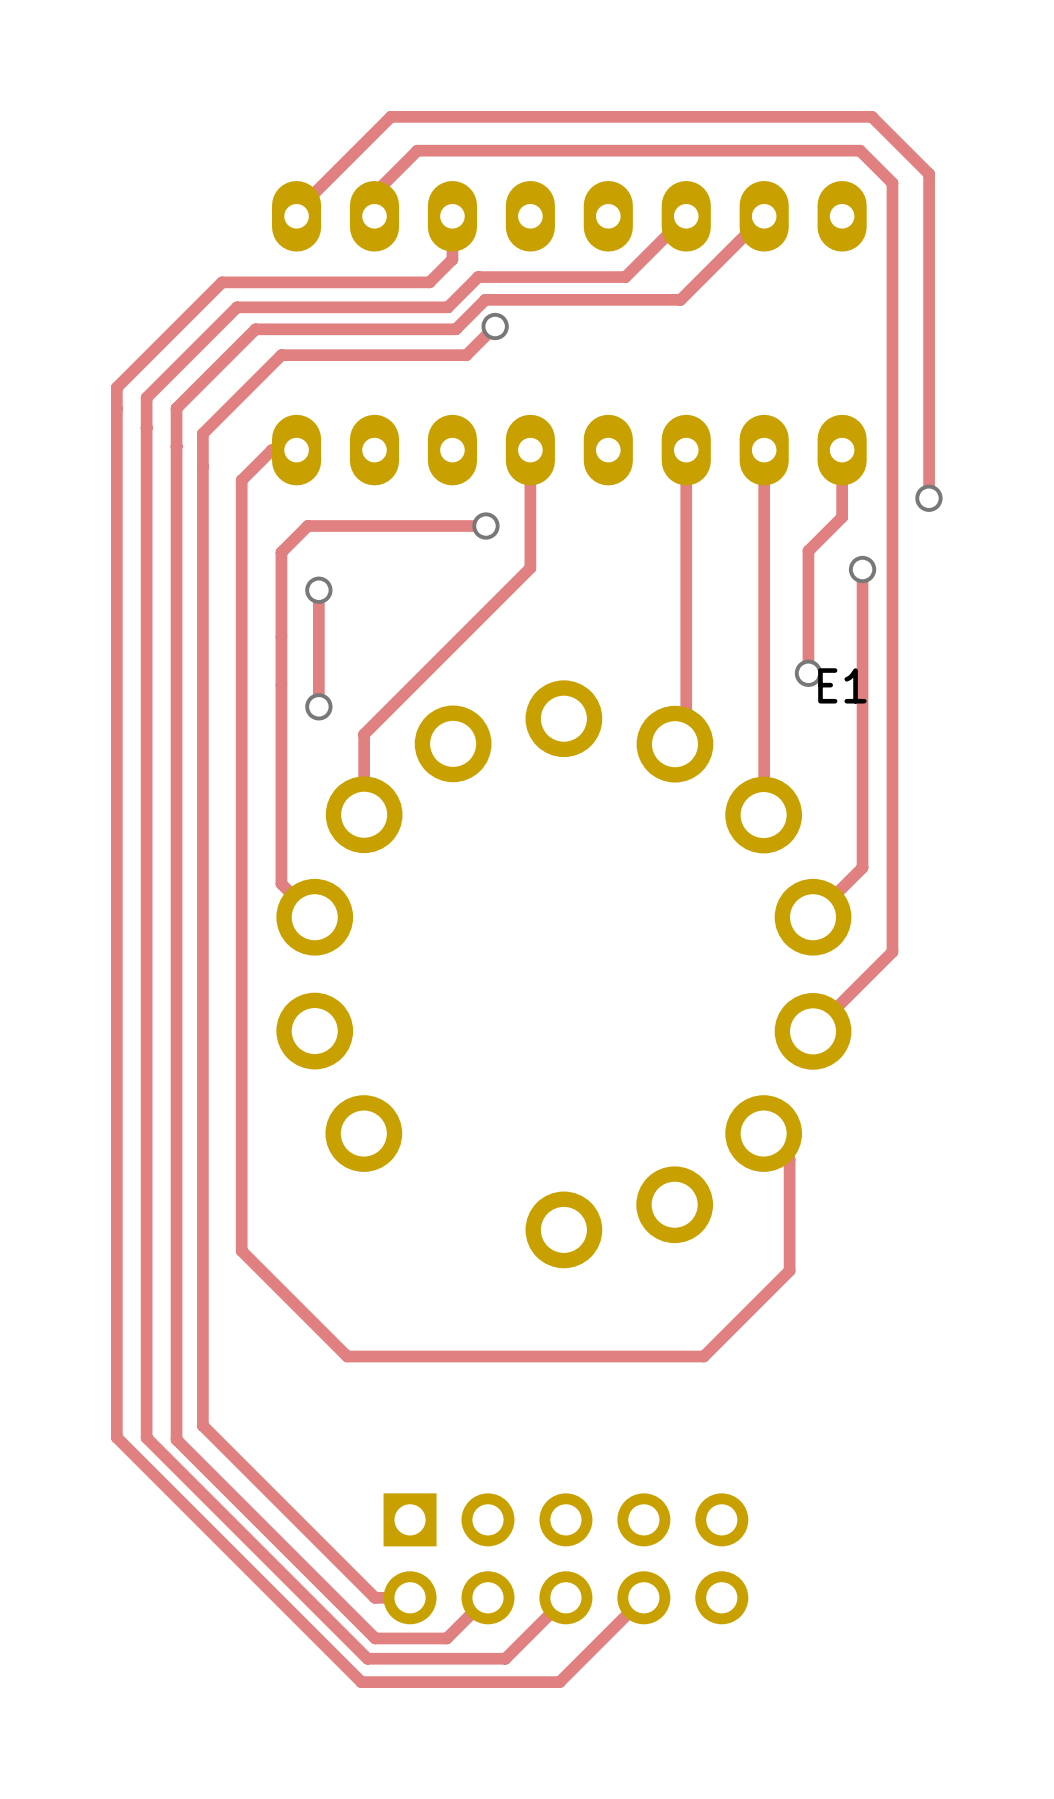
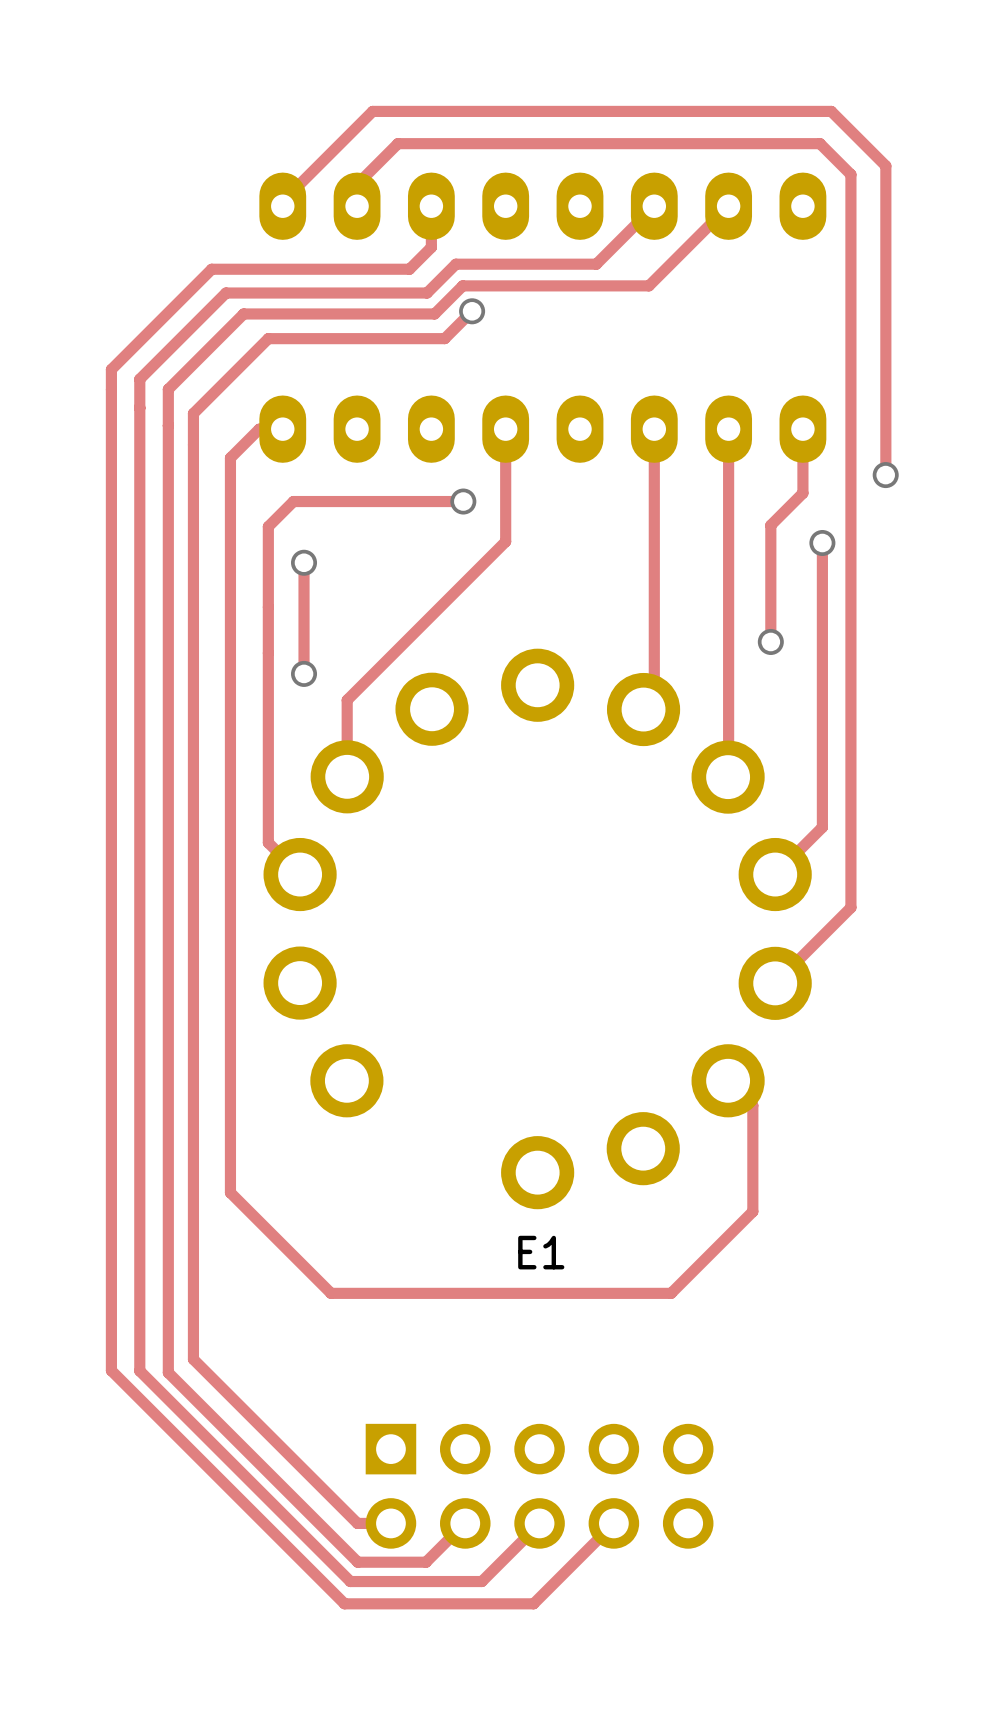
E1 name position: E1 (842, 685) -> E1 (541, 1252)

